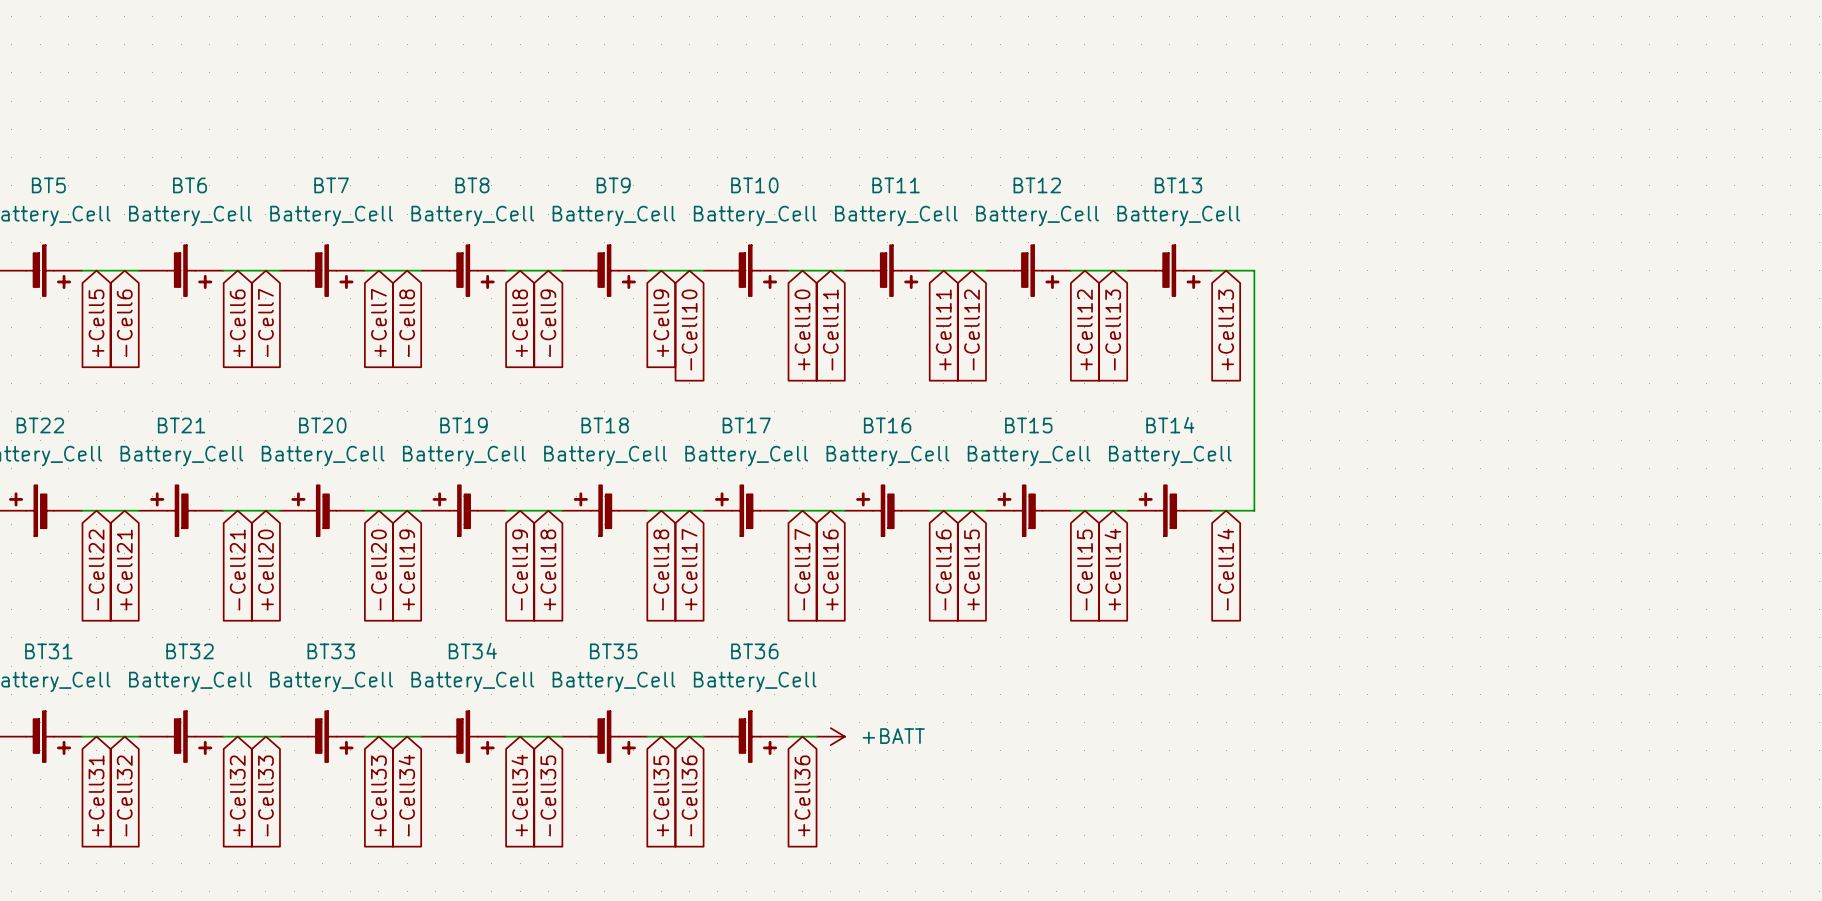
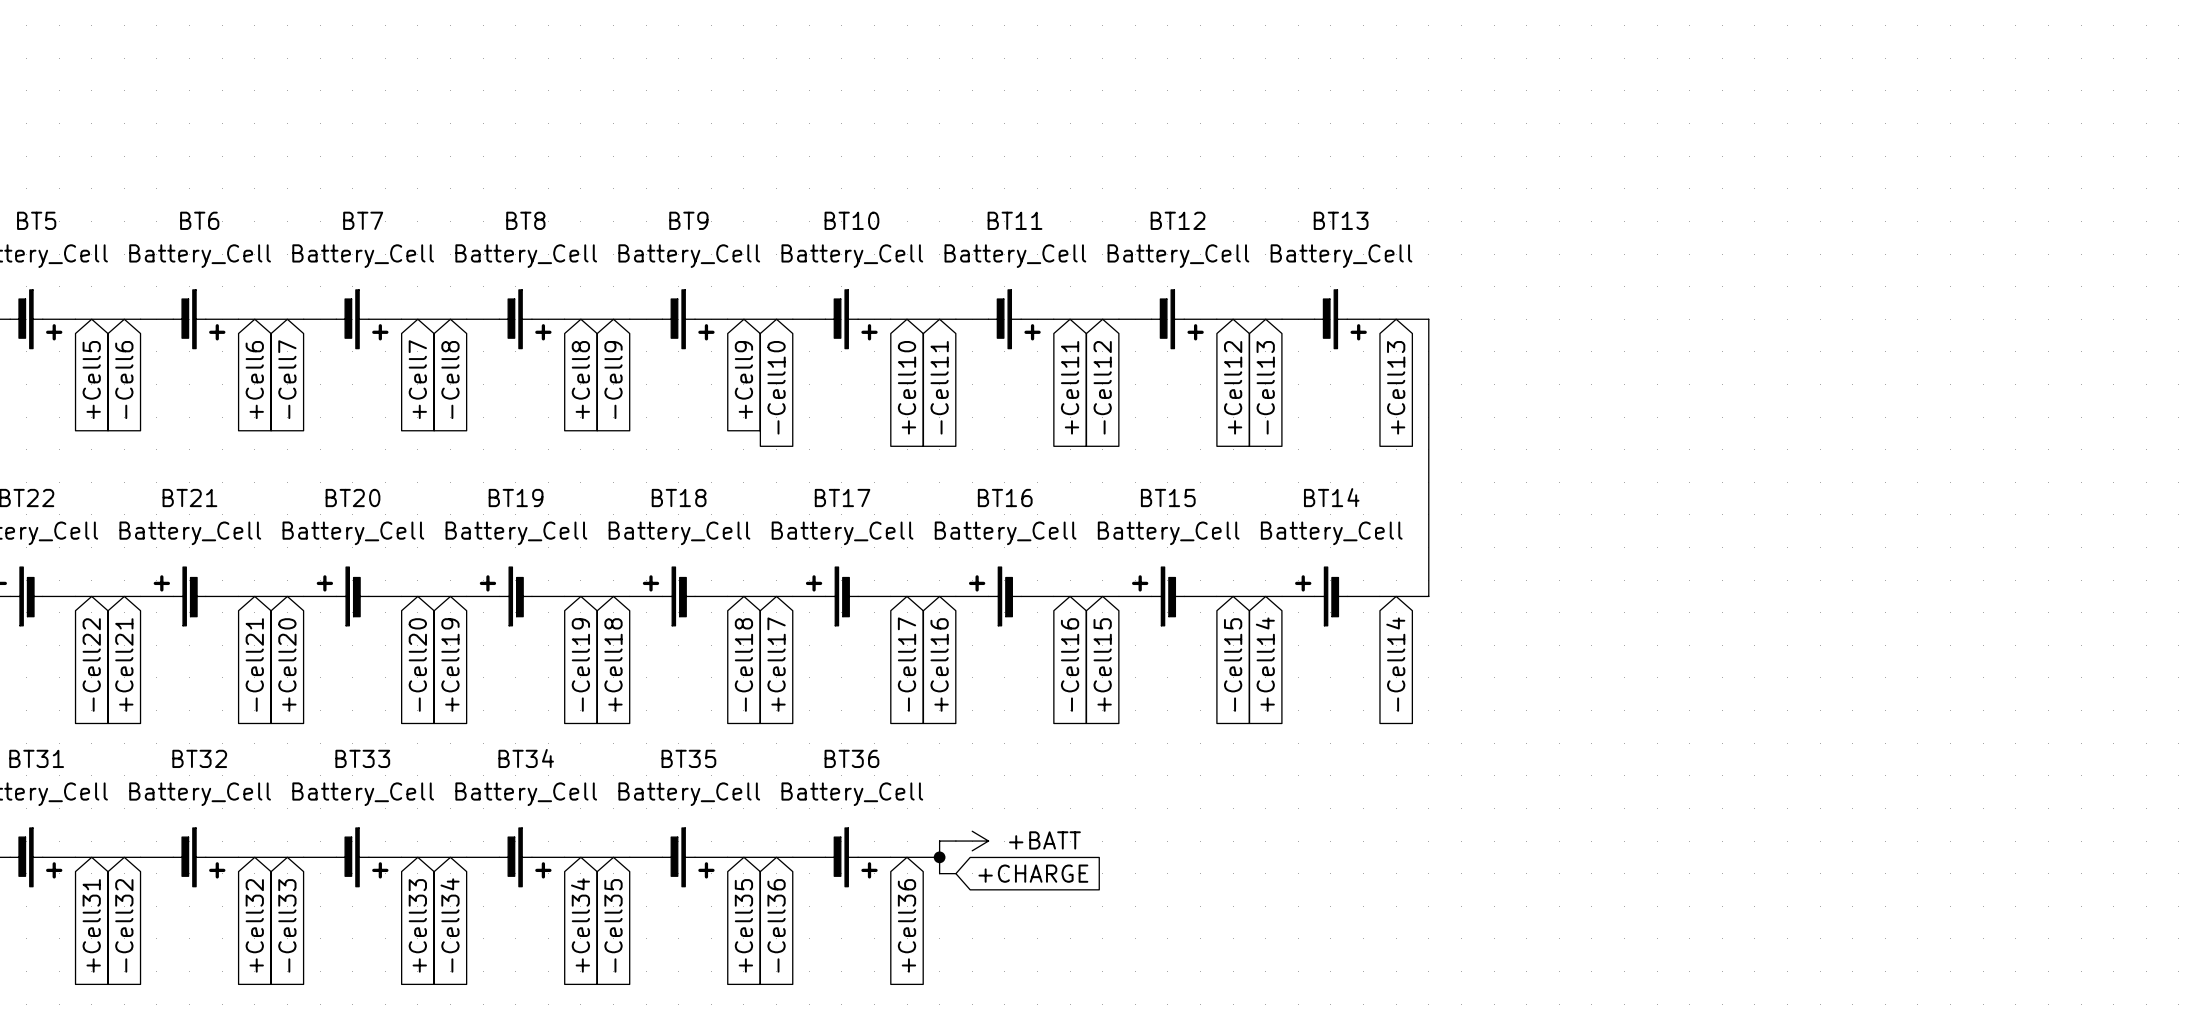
wire: none -> (955, 841) (939, 841) (939, 873) (955, 873)
power symbol position: +BATT (830, 736) -> +BATT (972, 841)
junction: none -> (939, 857)
global label: none -> +CHARGE (1033, 873)

